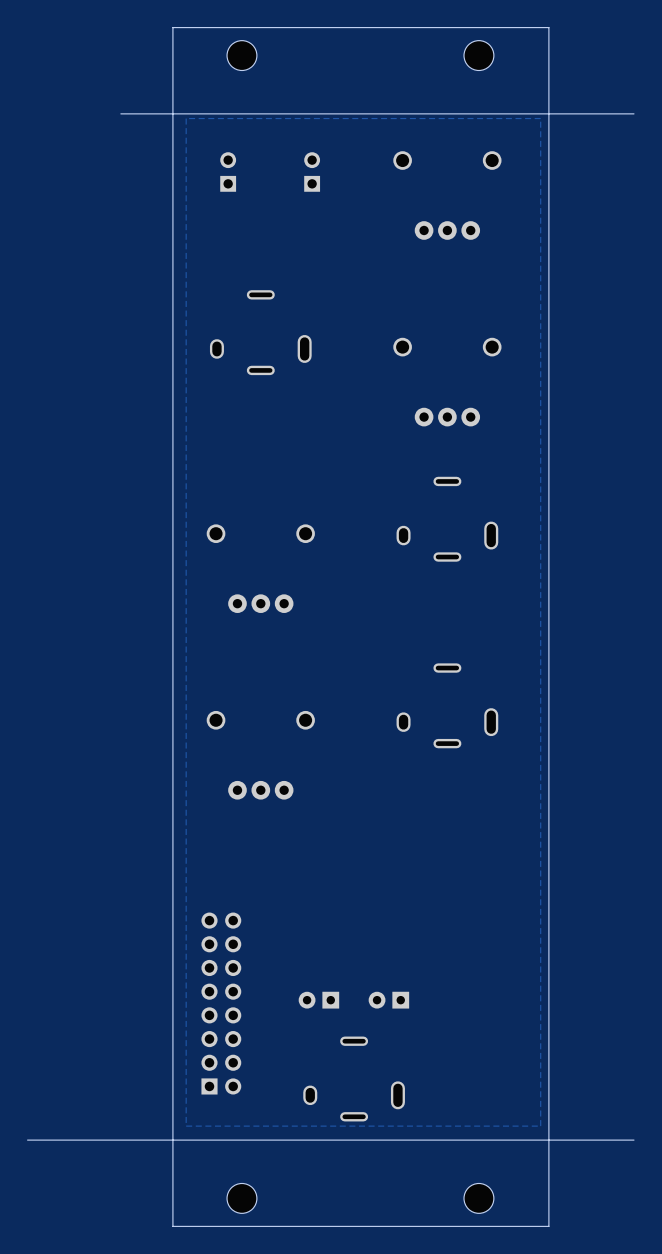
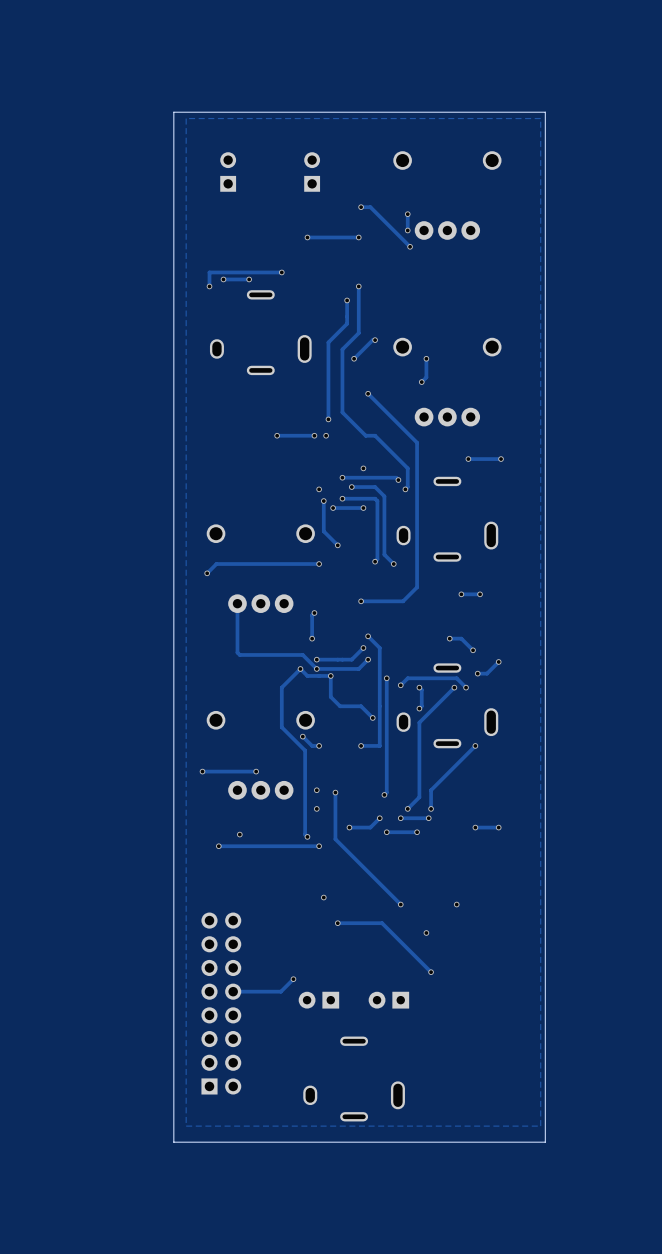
board edge: (548, 27) (172, 27) (172, 1226) (548, 1226) (548, 27) -> (545, 112) (545, 1142) (173, 1142) (173, 112) (545, 112)
part: (241, 55) -> none
part: (478, 55) -> none
board edge: (633, 113) (120, 113) -> none
track: none -> (361, 207) (370, 207) (410, 246)
via: none -> (361, 207)
track: none -> (407, 214) (407, 230)
via: none -> (407, 214)
via: none -> (407, 230)
via: none -> (307, 237)
track: none -> (358, 237) (307, 237)
via: none -> (358, 237)
via: none -> (410, 246)
track: none -> (281, 272) (209, 272) (209, 286)
via: none -> (281, 272)
via: none -> (223, 279)
track: none -> (249, 279) (223, 279)
via: none -> (249, 279)
via: none -> (209, 286)
track: none -> (358, 286) (358, 333) (342, 349) (342, 412) (365, 435) (375, 435) (407, 468) (407, 487) (405, 489)
via: none -> (358, 286)
track: none -> (347, 300) (347, 323) (328, 342) (328, 419)
via: none -> (347, 300)
track: none -> (375, 340) (372, 340) (354, 358)
via: none -> (375, 340)
via: none -> (354, 358)
track: none -> (426, 358) (426, 377) (421, 382)
via: none -> (426, 358)
via: none -> (421, 382)
track: none -> (368, 393) (417, 442) (417, 587) (403, 601) (361, 601)
via: none -> (368, 393)
via: none -> (328, 419)
via: none -> (277, 435)
track: none -> (314, 435) (277, 435)
via: none -> (314, 435)
via: none -> (326, 435)
via: none -> (468, 459)
track: none -> (501, 459) (468, 459)
via: none -> (501, 459)
via: none -> (363, 468)
track: none -> (342, 477) (396, 477) (398, 480)
via: none -> (342, 477)
via: none -> (398, 480)
track: none -> (351, 487) (375, 487) (384, 496) (384, 554) (393, 564)
via: none -> (351, 487)
via: none -> (319, 489)
via: none -> (405, 489)
track: none -> (342, 498) (375, 498) (377, 501) (377, 559) (375, 561)
via: none -> (342, 498)
track: none -> (323, 501) (323, 531) (337, 545)
via: none -> (323, 501)
via: none -> (333, 508)
track: none -> (363, 508) (333, 508)
via: none -> (363, 508)
via: none -> (337, 545)
via: none -> (375, 561)
track: none -> (319, 564) (216, 564) (207, 573)
via: none -> (319, 564)
via: none -> (393, 564)
via: none -> (207, 573)
via: none -> (461, 594)
track: none -> (480, 594) (461, 594)
via: none -> (480, 594)
via: none -> (361, 601)
track: none -> (237, 603) (237, 652) (239, 654) (302, 654) (316, 668) (358, 668) (368, 659)
track: none -> (314, 612) (312, 615) (312, 638)
via: none -> (314, 612)
track: none -> (368, 636) (379, 647) (379, 745) (361, 745)
via: none -> (368, 636)
via: none -> (312, 638)
track: none -> (449, 638) (461, 638) (473, 650)
via: none -> (449, 638)
track: none -> (363, 647) (351, 659) (316, 659)
via: none -> (363, 647)
via: none -> (473, 650)
via: none -> (316, 659)
via: none -> (368, 659)
track: none -> (498, 661) (487, 673) (477, 673)
via: none -> (498, 661)
via: none -> (300, 668)
via: none -> (316, 668)
via: none -> (477, 673)
via: none -> (330, 675)
track: none -> (386, 678) (386, 792) (384, 794)
via: none -> (386, 678)
track: none -> (400, 685) (407, 678) (456, 678) (466, 687)
via: none -> (400, 685)
track: none -> (419, 687) (421, 689) (421, 706) (419, 708)
via: none -> (419, 687)
track: none -> (454, 687) (419, 722) (419, 797) (407, 808)
via: none -> (454, 687)
via: none -> (466, 687)
via: none -> (419, 708)
track: none -> (372, 717) (361, 706) (340, 706) (330, 696) (330, 675) (307, 675) (300, 668) (281, 687) (281, 727) (305, 750) (305, 834) (307, 836)
via: none -> (372, 717)
track: none -> (302, 736) (312, 745) (319, 745)
via: none -> (302, 736)
via: none -> (319, 745)
via: none -> (361, 745)
track: none -> (475, 745) (431, 790) (431, 808)
via: none -> (475, 745)
via: none -> (202, 771)
track: none -> (256, 771) (202, 771)
via: none -> (256, 771)
via: none -> (316, 790)
track: none -> (335, 792) (335, 839) (400, 904)
via: none -> (335, 792)
via: none -> (384, 794)
via: none -> (316, 808)
via: none -> (407, 808)
via: none -> (431, 808)
track: none -> (379, 818) (370, 827) (349, 827)
via: none -> (379, 818)
via: none -> (400, 818)
track: none -> (428, 818) (400, 818)
via: none -> (428, 818)
via: none -> (349, 827)
via: none -> (475, 827)
track: none -> (498, 827) (475, 827)
via: none -> (498, 827)
via: none -> (386, 832)
track: none -> (417, 832) (386, 832)
via: none -> (417, 832)
via: none -> (239, 834)
via: none -> (307, 836)
via: none -> (218, 846)
track: none -> (319, 846) (218, 846)
via: none -> (319, 846)
via: none -> (323, 897)
via: none -> (400, 904)
via: none -> (456, 904)
track: none -> (337, 923) (382, 923) (431, 972)
via: none -> (337, 923)
via: none -> (426, 932)
via: none -> (431, 972)
track: none -> (293, 979) (280, 991) (233, 991)
via: none -> (293, 979)
board edge: (633, 1140) (27, 1140) -> none
part: (241, 1198) -> none
part: (478, 1198) -> none

